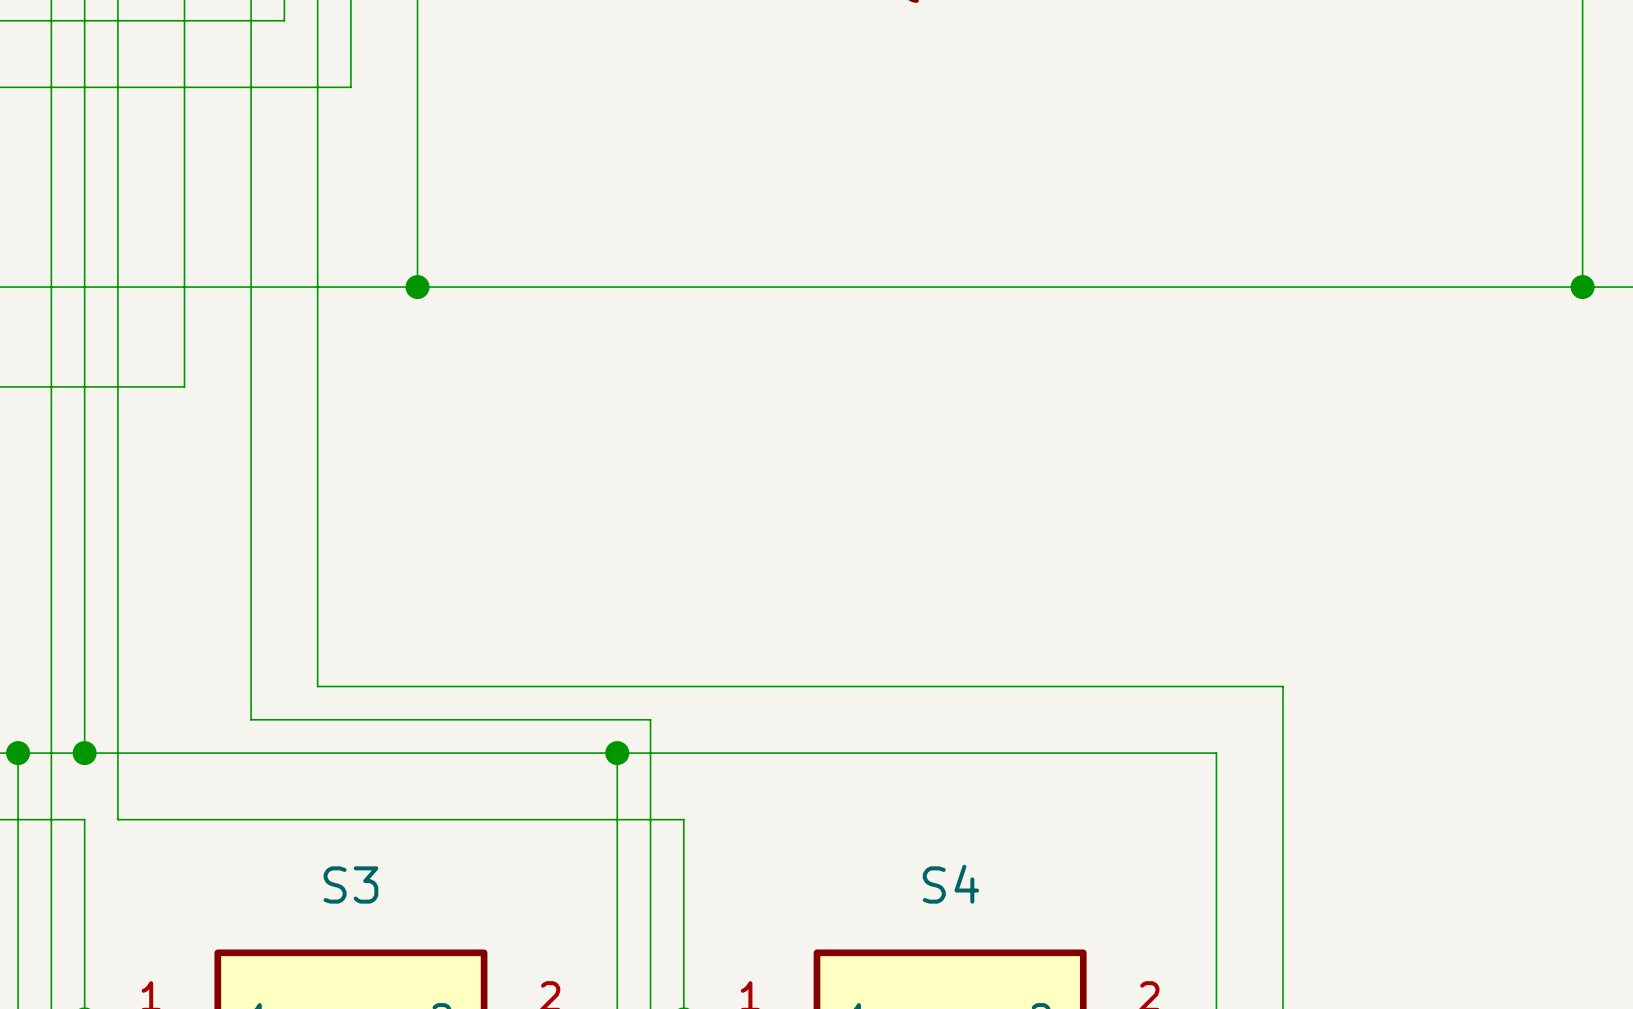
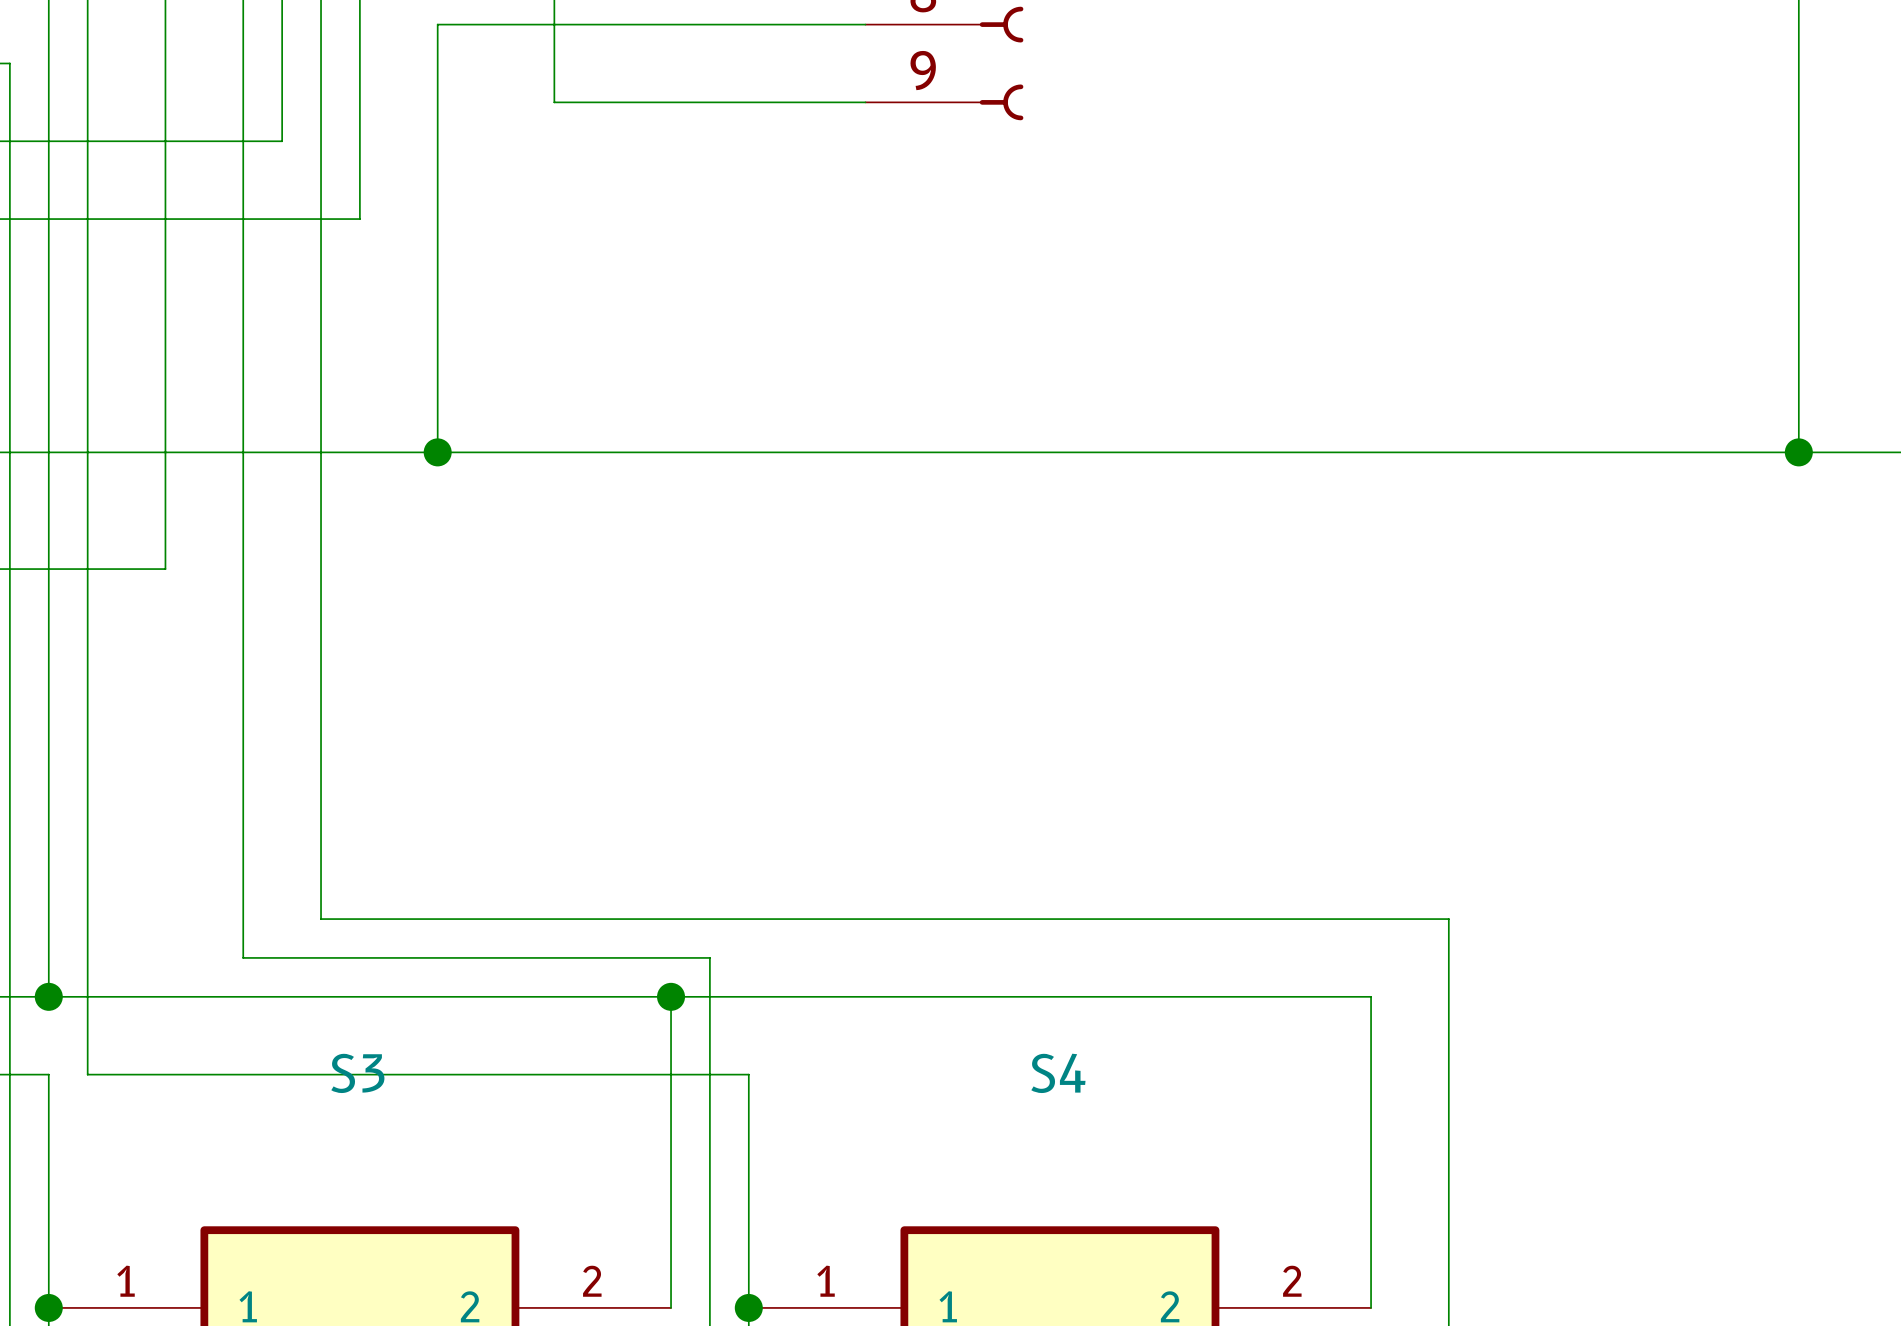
S3 name position: S3 (350, 884) -> S3 (357, 1073)
S4 name position: S4 (950, 884) -> S4 (1058, 1073)

